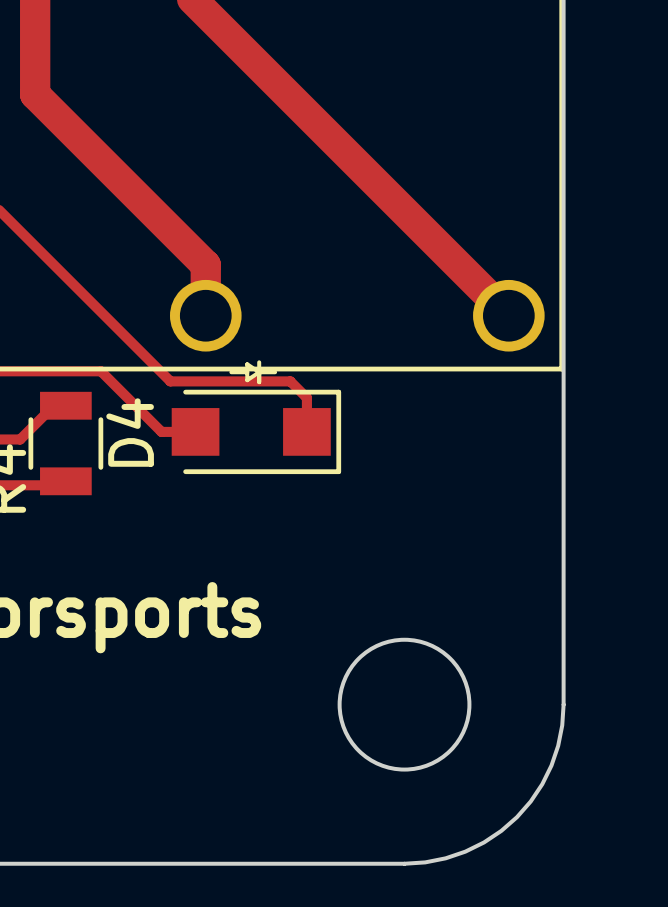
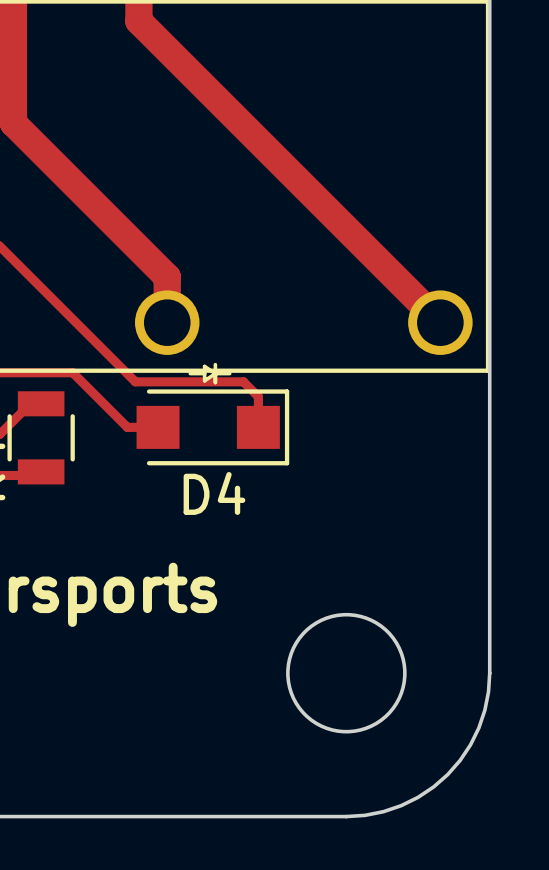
D4 name rotation: 0° (130, 432) -> 90° clockwise (214, 493)
D4 name position: D4 (130, 432) -> D4 (214, 493)

